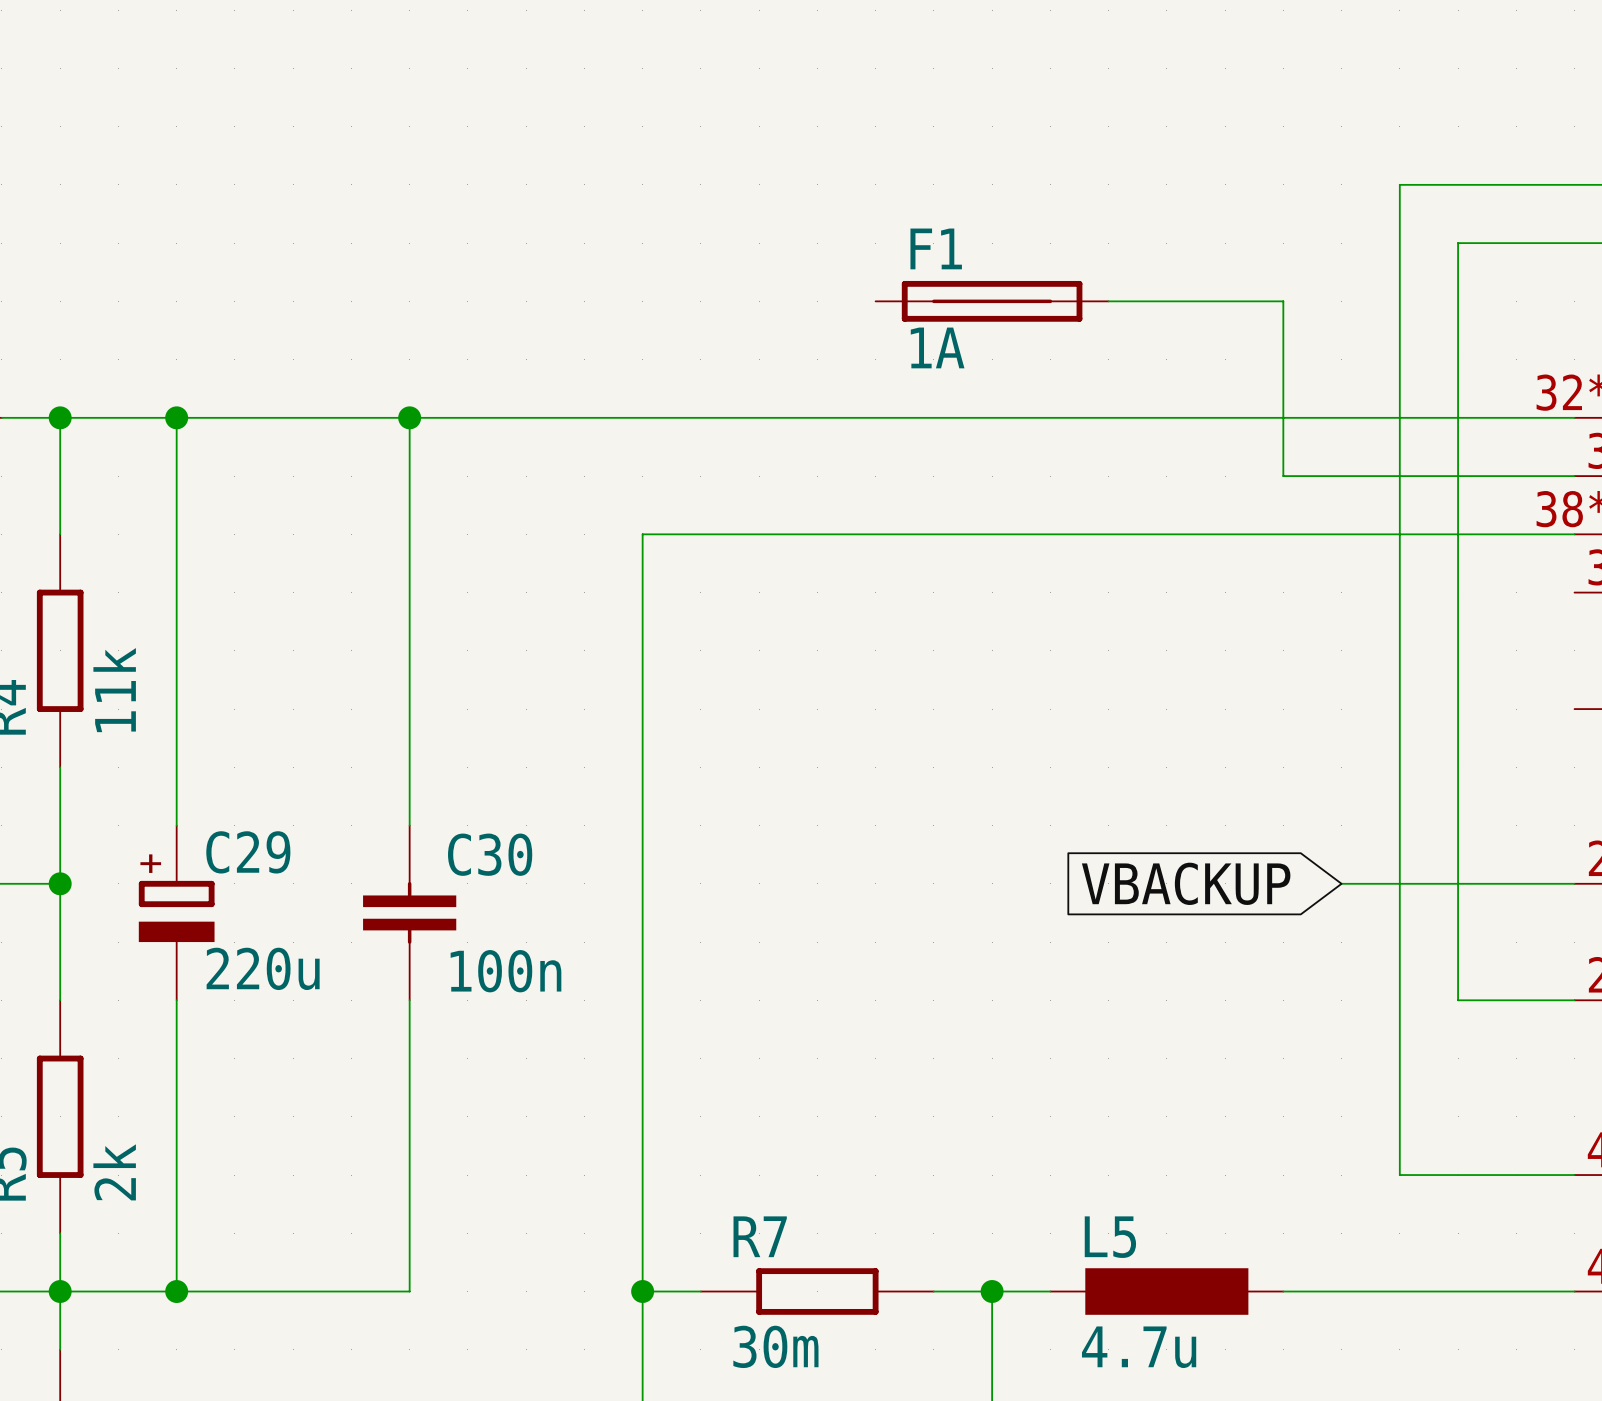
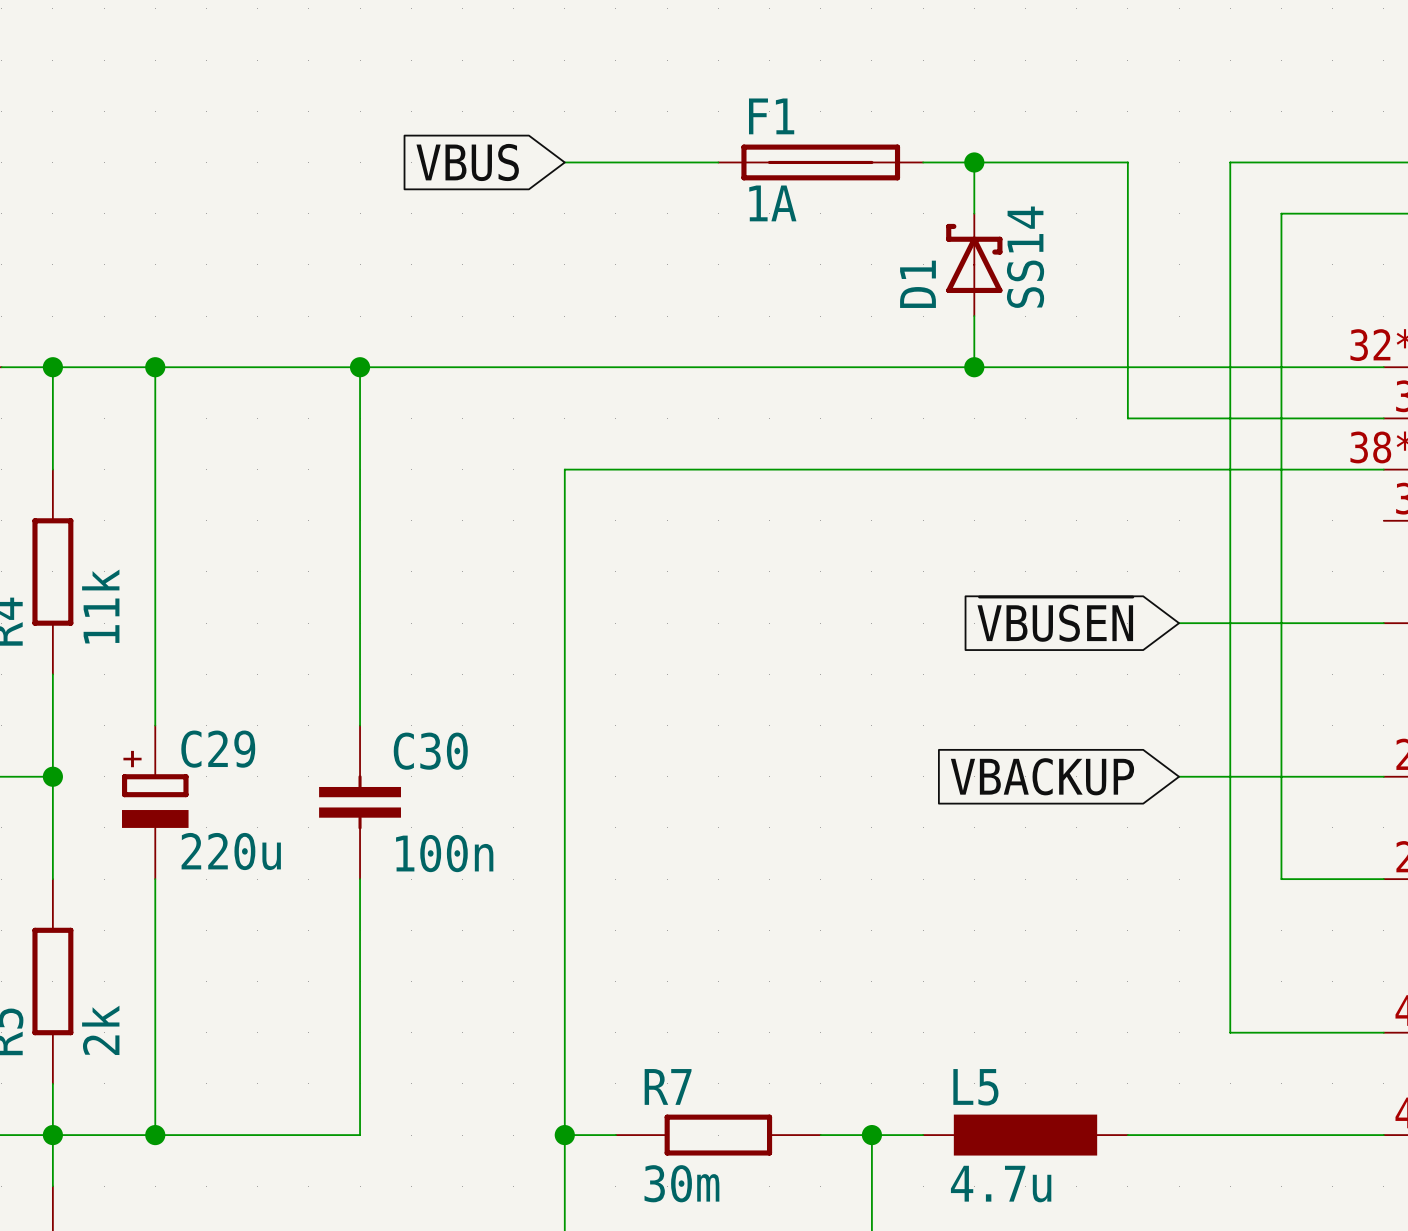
global label: none -> VBUS (467, 162)
wire: none -> (564, 162) (718, 162)
wire: none -> (974, 162) (974, 213)
junction: none -> (974, 162)
F1 position: (992, 301) -> (820, 162)
wire: (1108, 301) (1283, 301) -> (923, 162) (1127, 162) (1127, 264)
D1: none -> SS14 (974, 264)
wire: none -> (974, 316) (974, 367)
junction: none -> (974, 367)
global label: none -> ~{VBUSEN} (1055, 619)
wire: none -> (1179, 623) (1383, 623)

